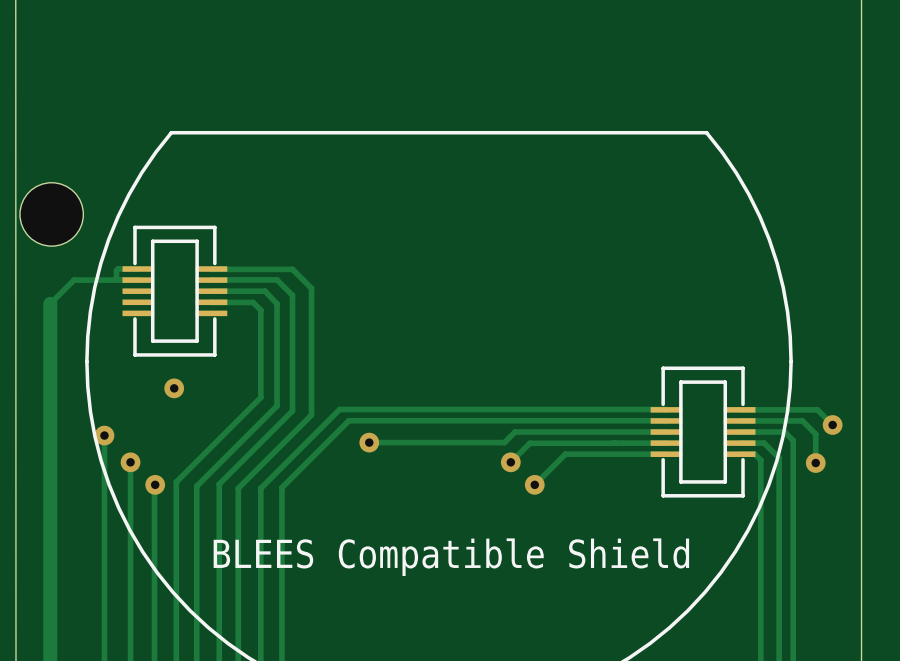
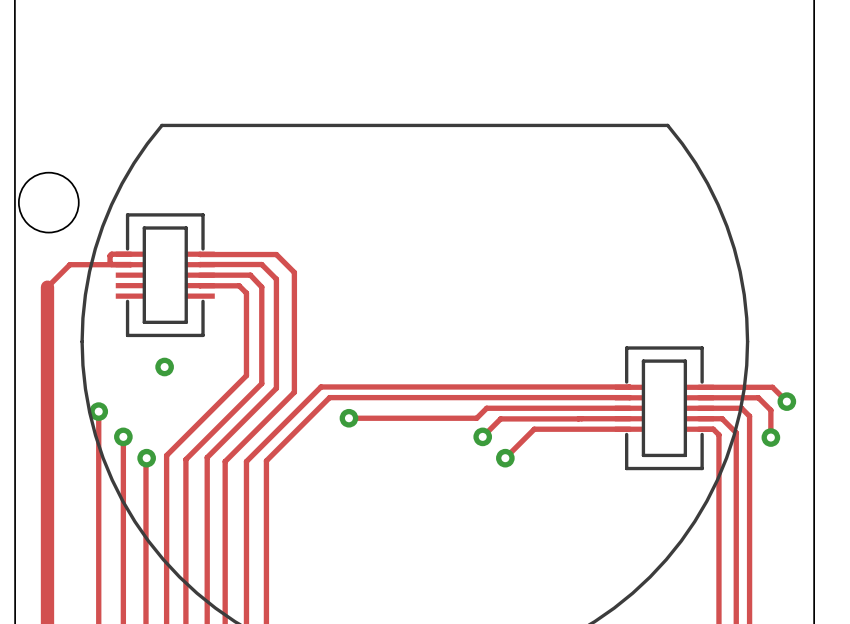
text: BLEES Compatible Shield (451, 557) -> none

